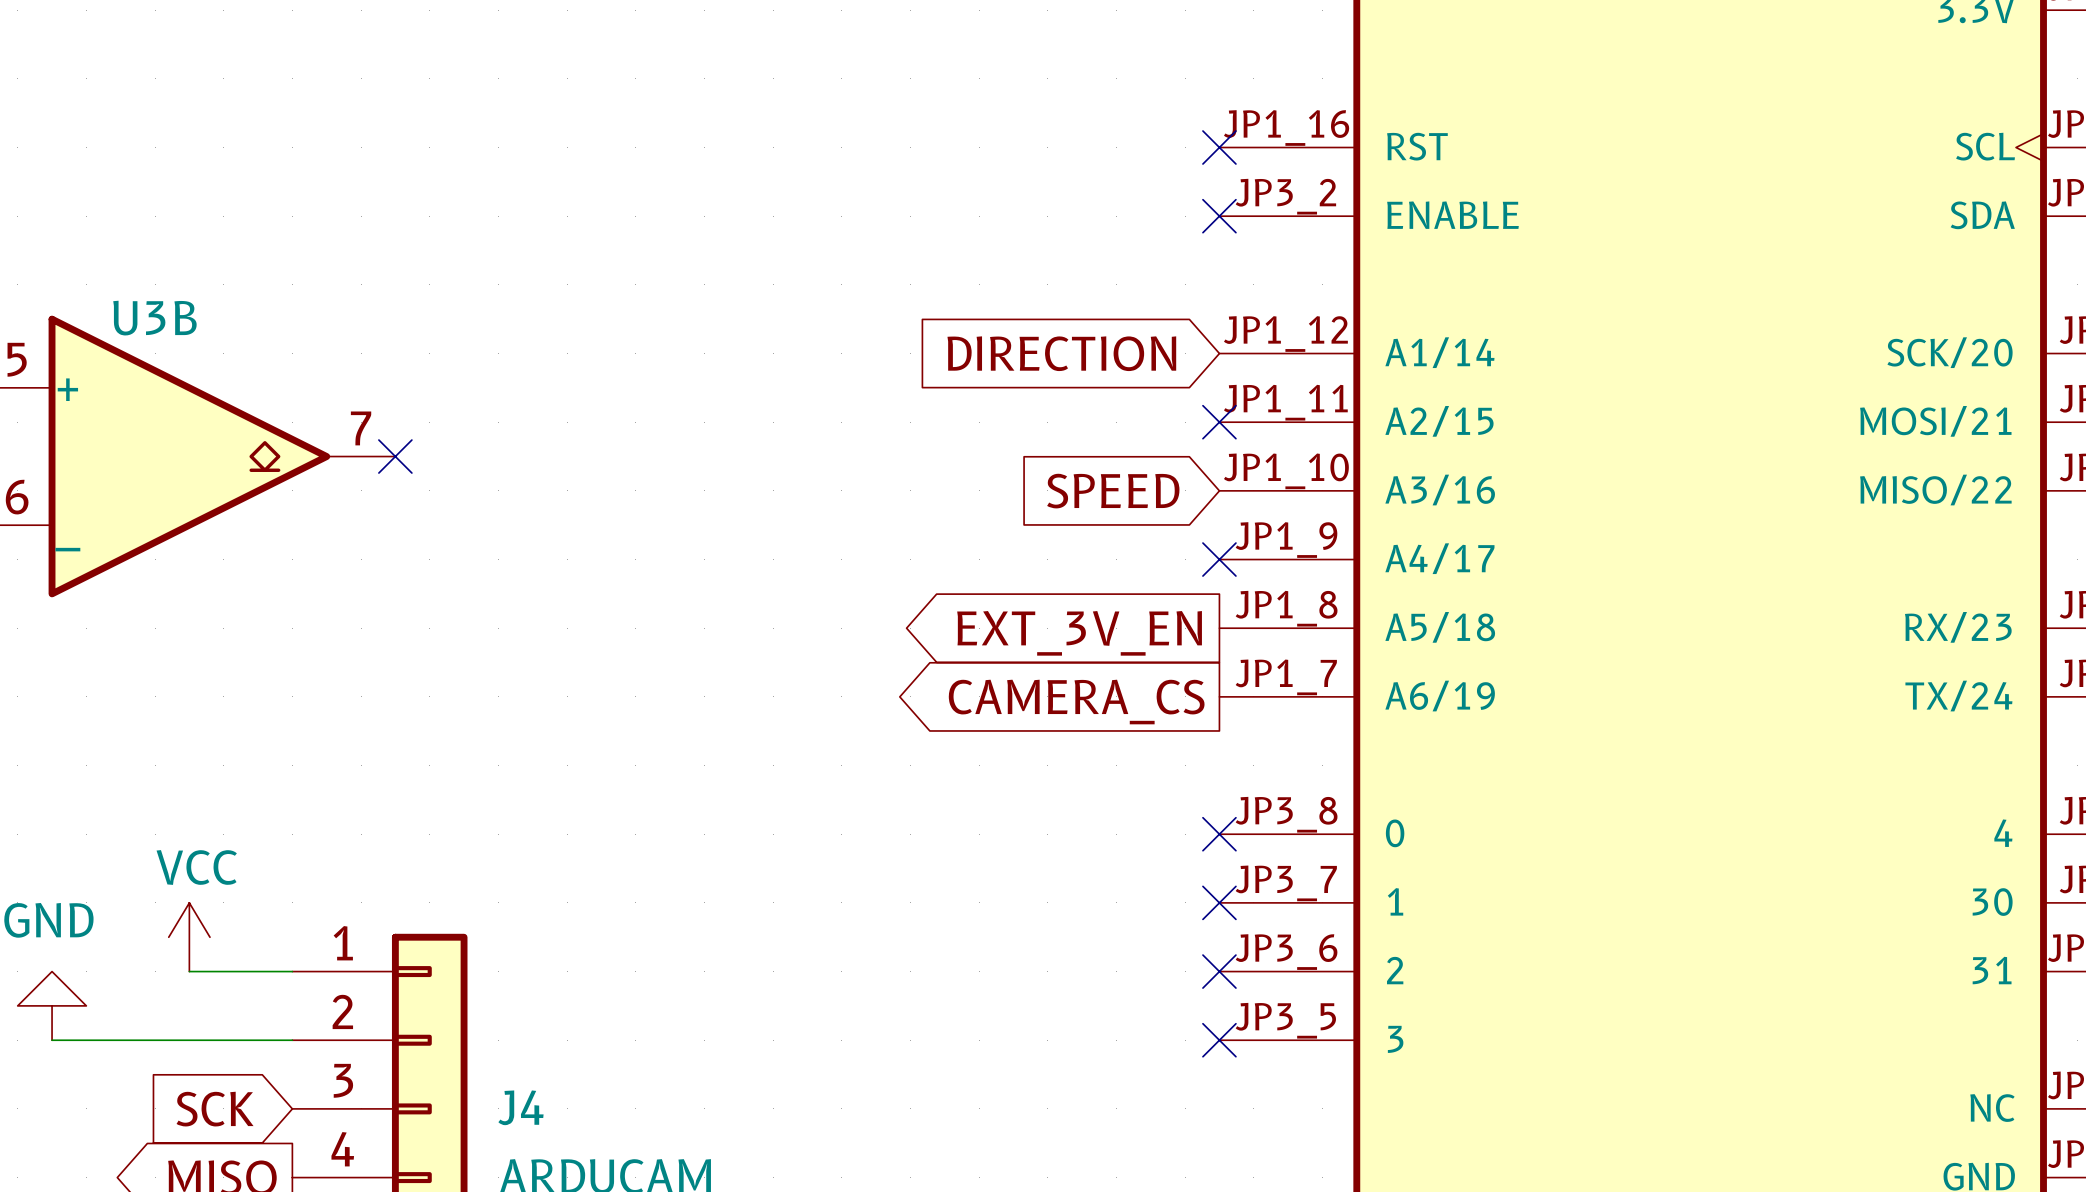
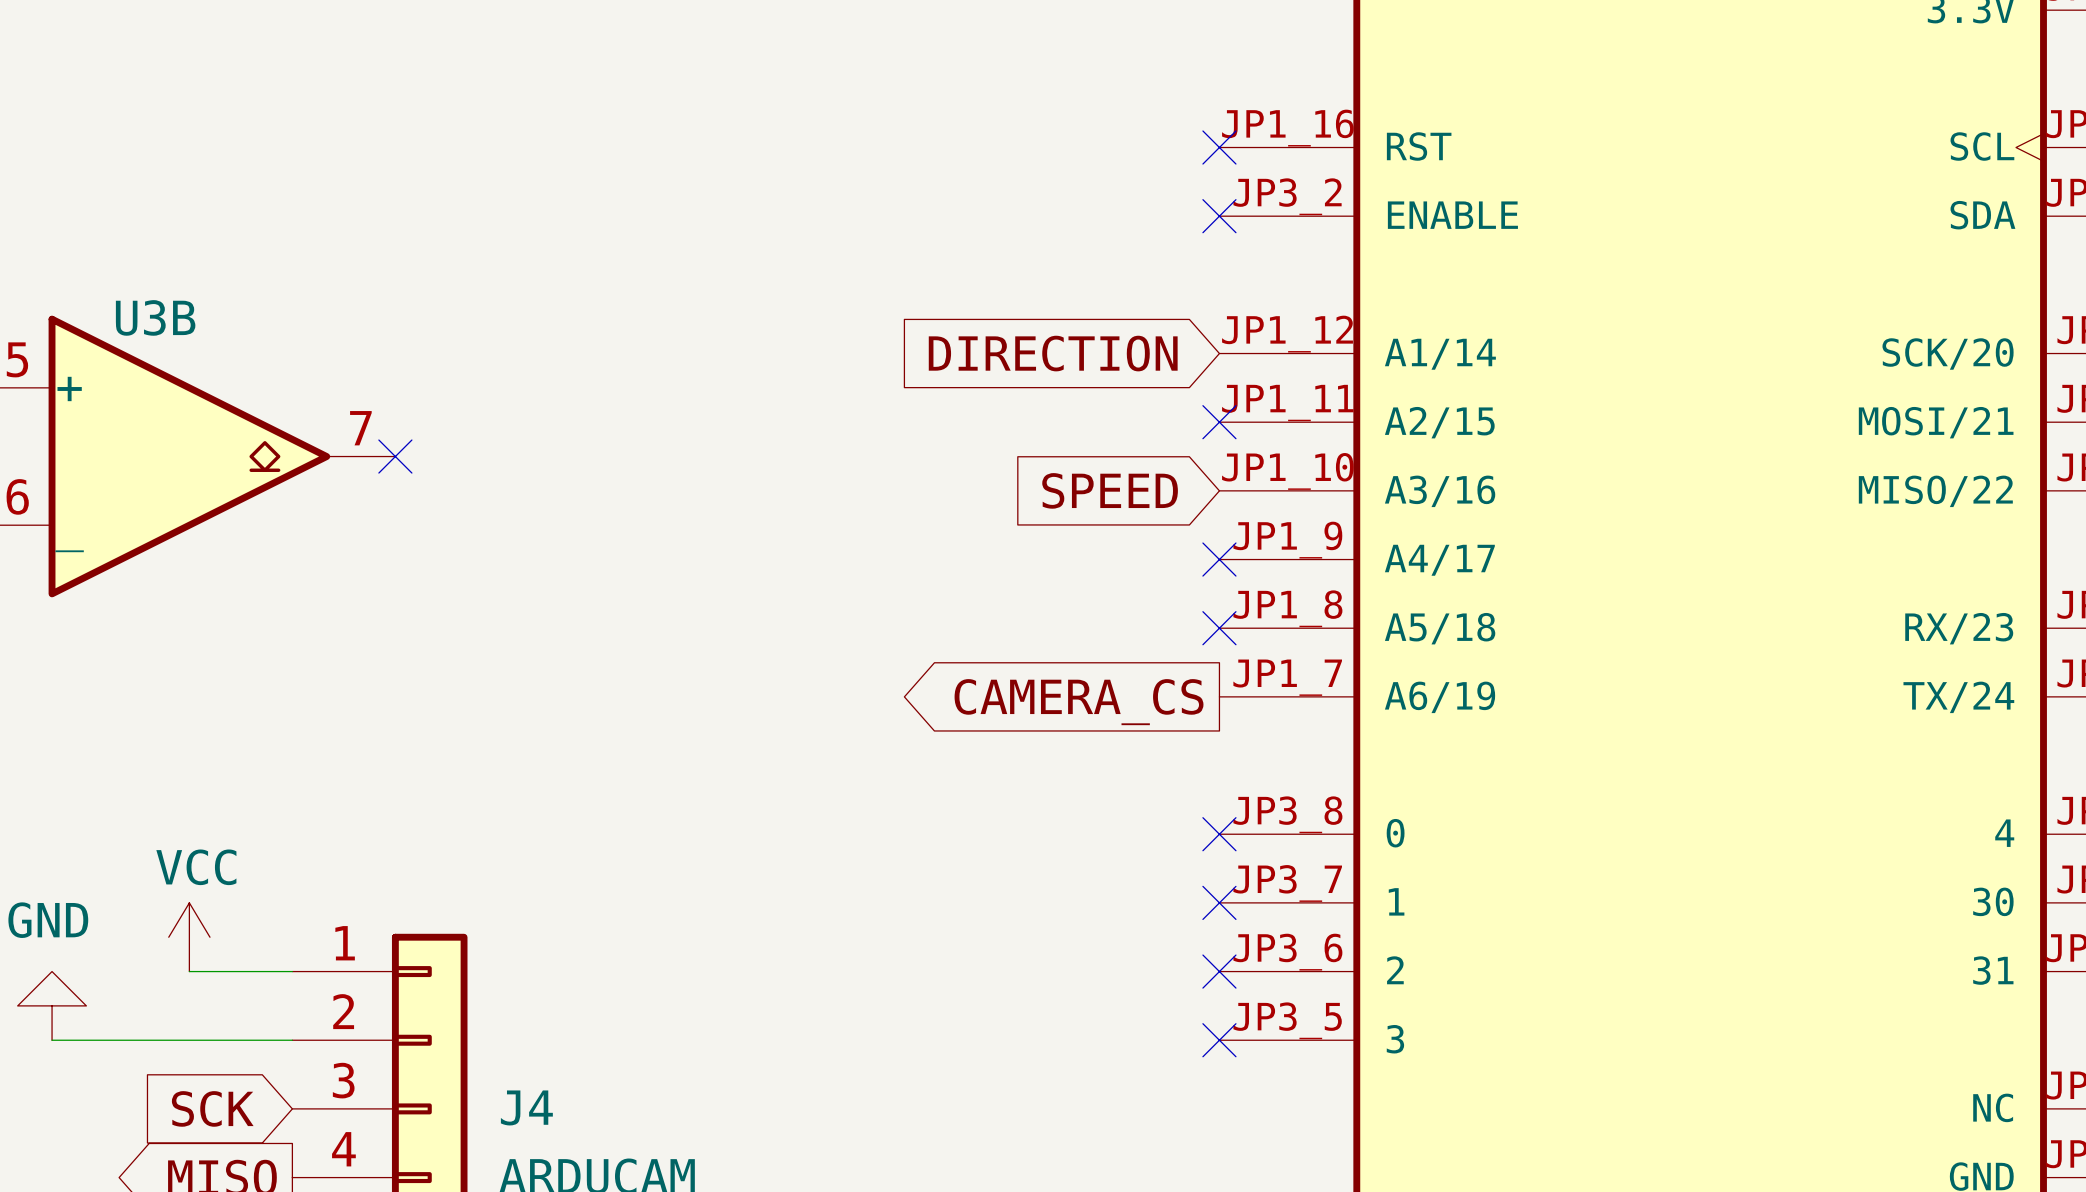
no-connect mark: none -> (1219, 628)
global label: EXT_3V_EN (1079, 633) -> none

